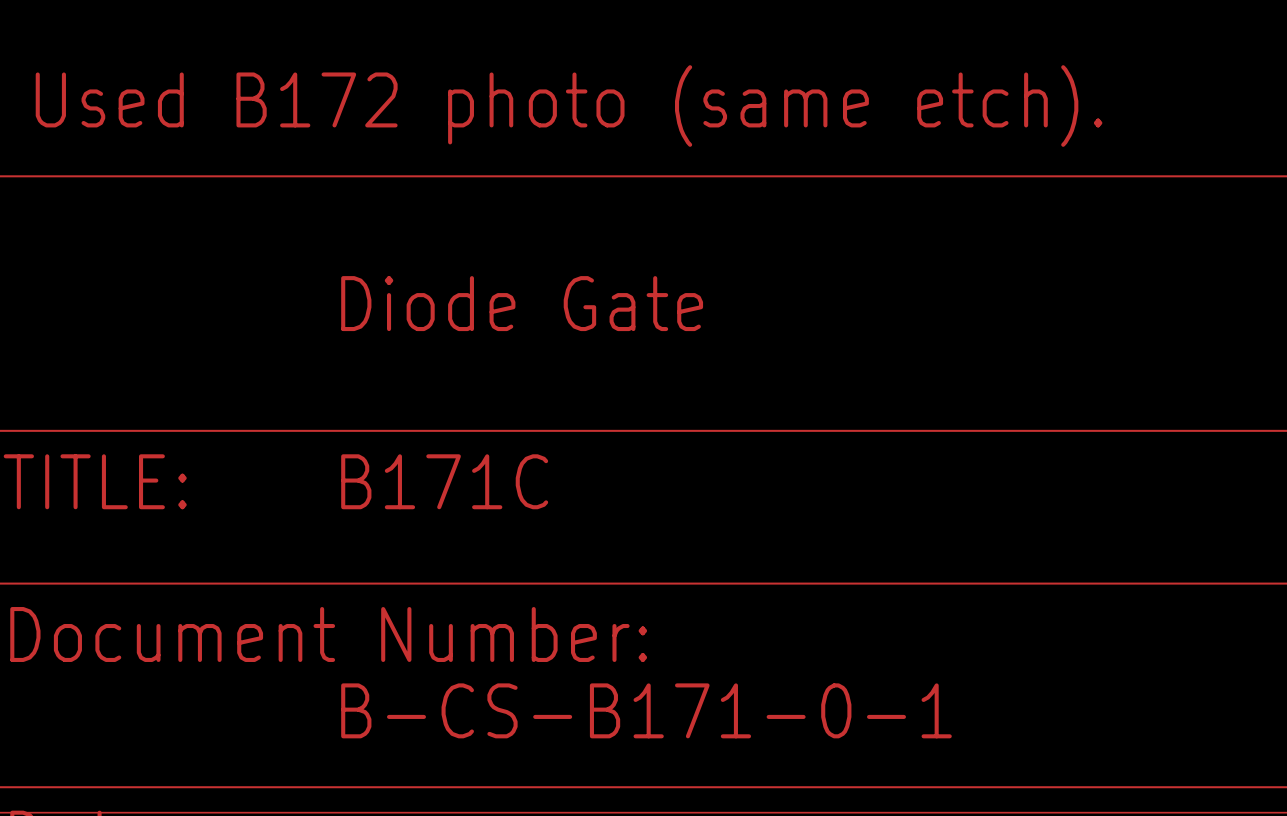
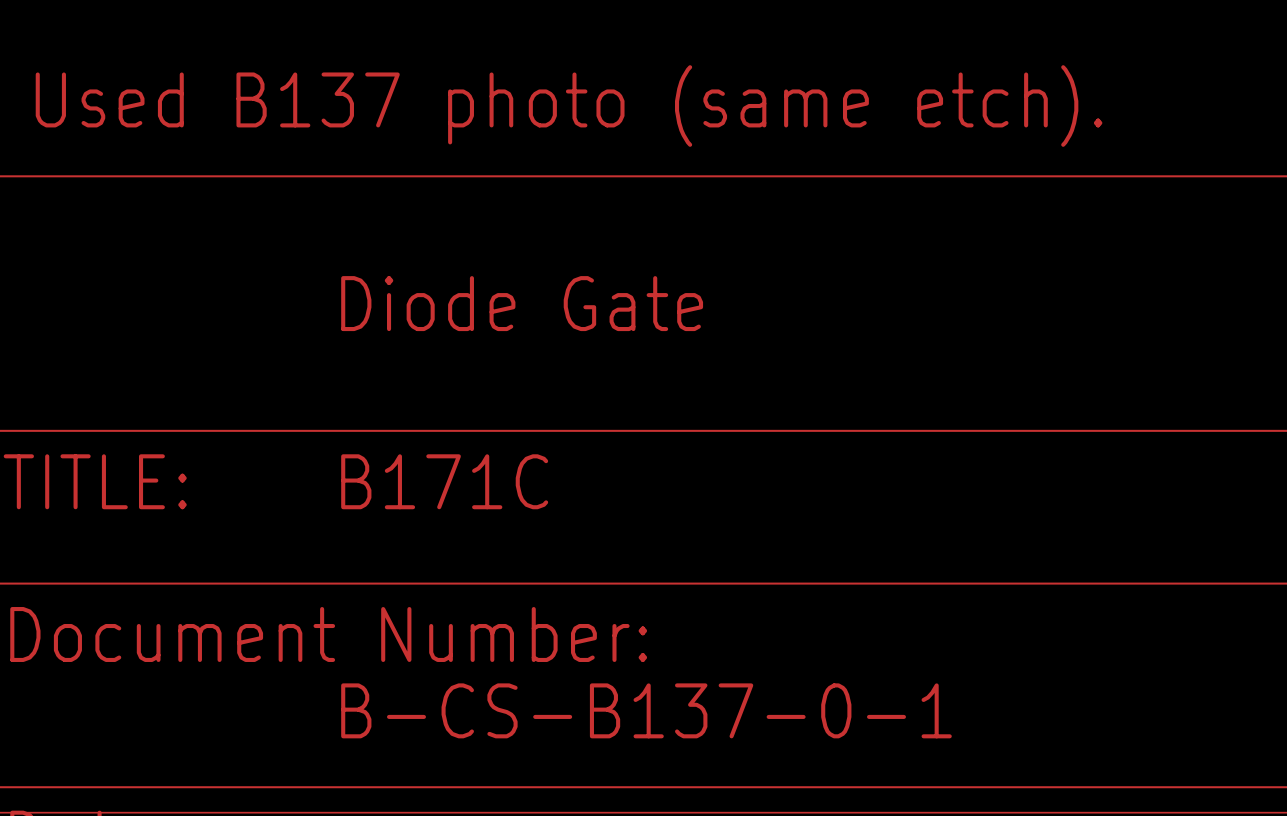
text: Used B172 photo (same etch). (569, 106) -> Used B137 photo (same etch). (569, 106)
text: B-CS-B171-0-1 (646, 710) -> B-CS-B137-0-1 (646, 710)

